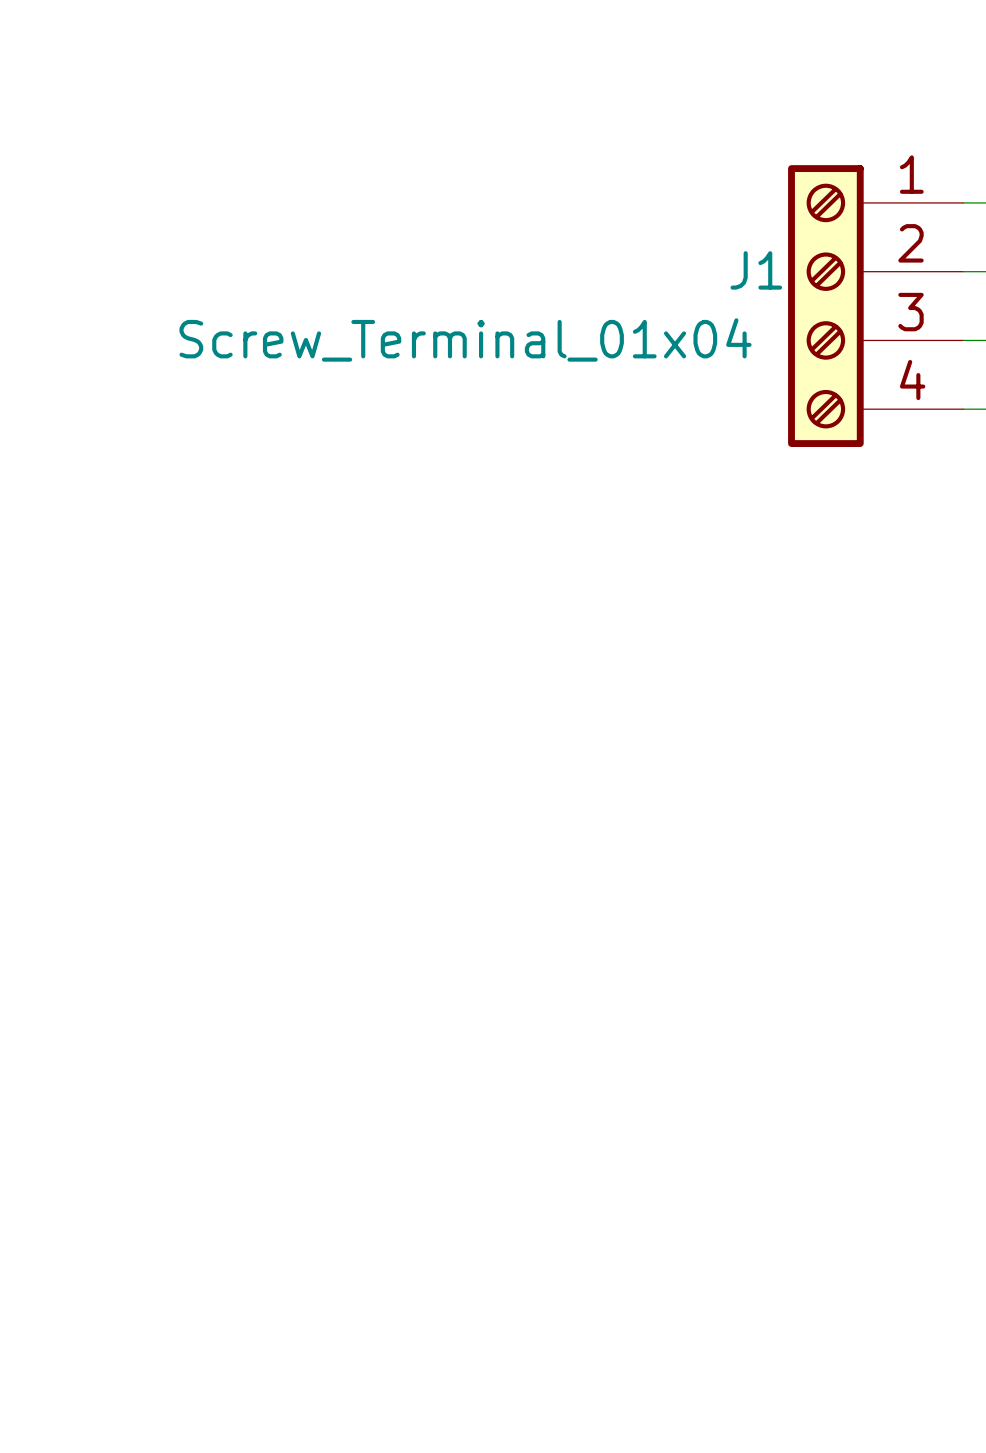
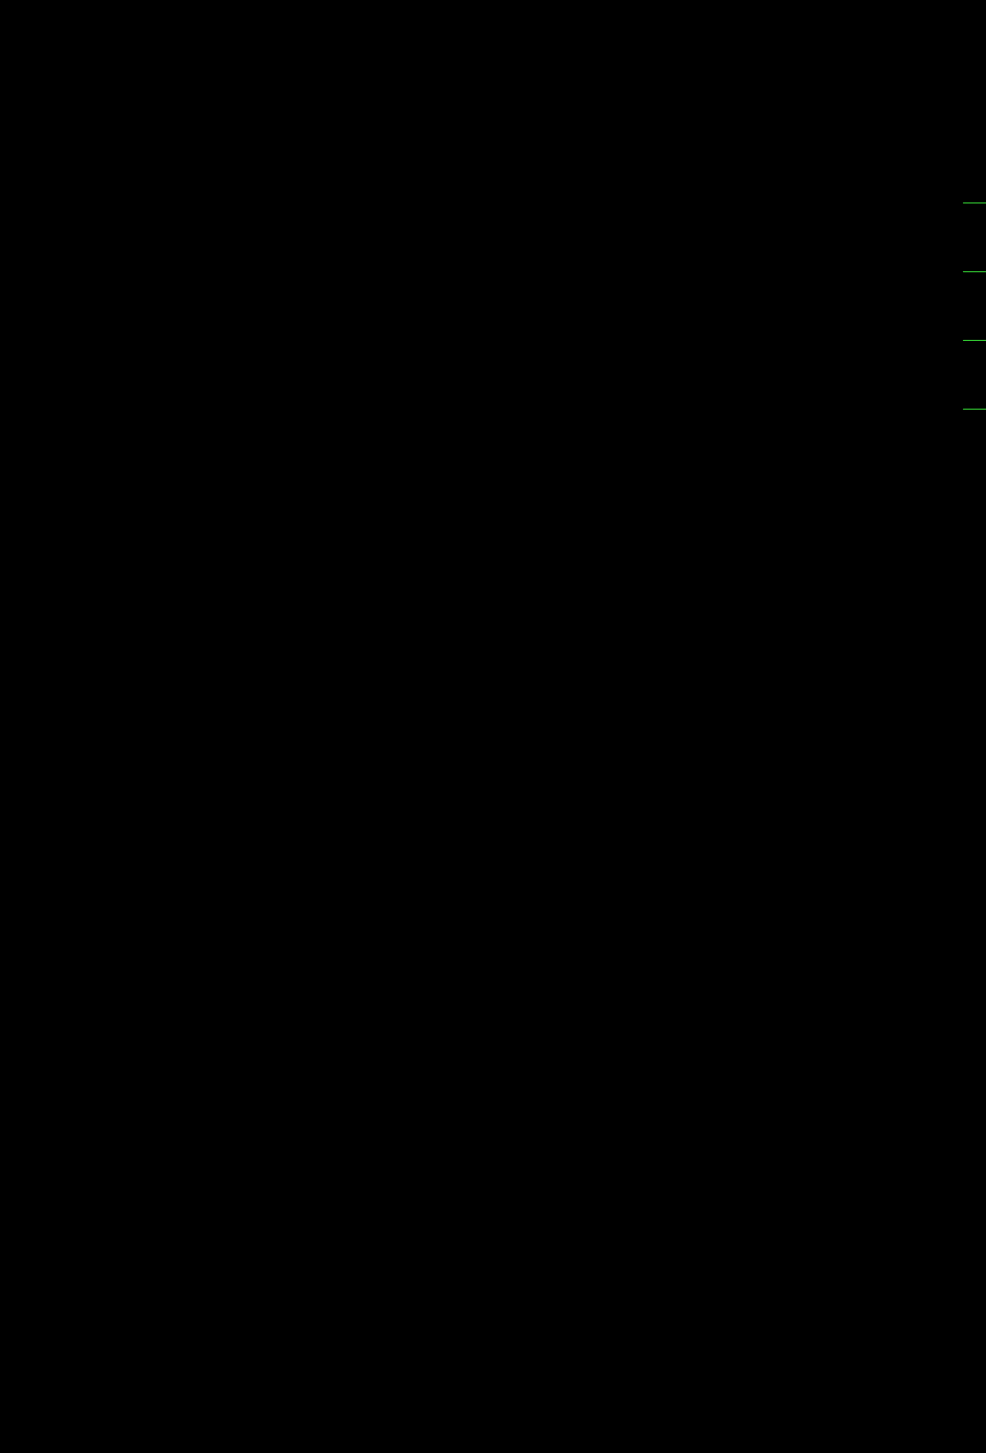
J1: Screw_Terminal_01x04 (875, 306) -> none

